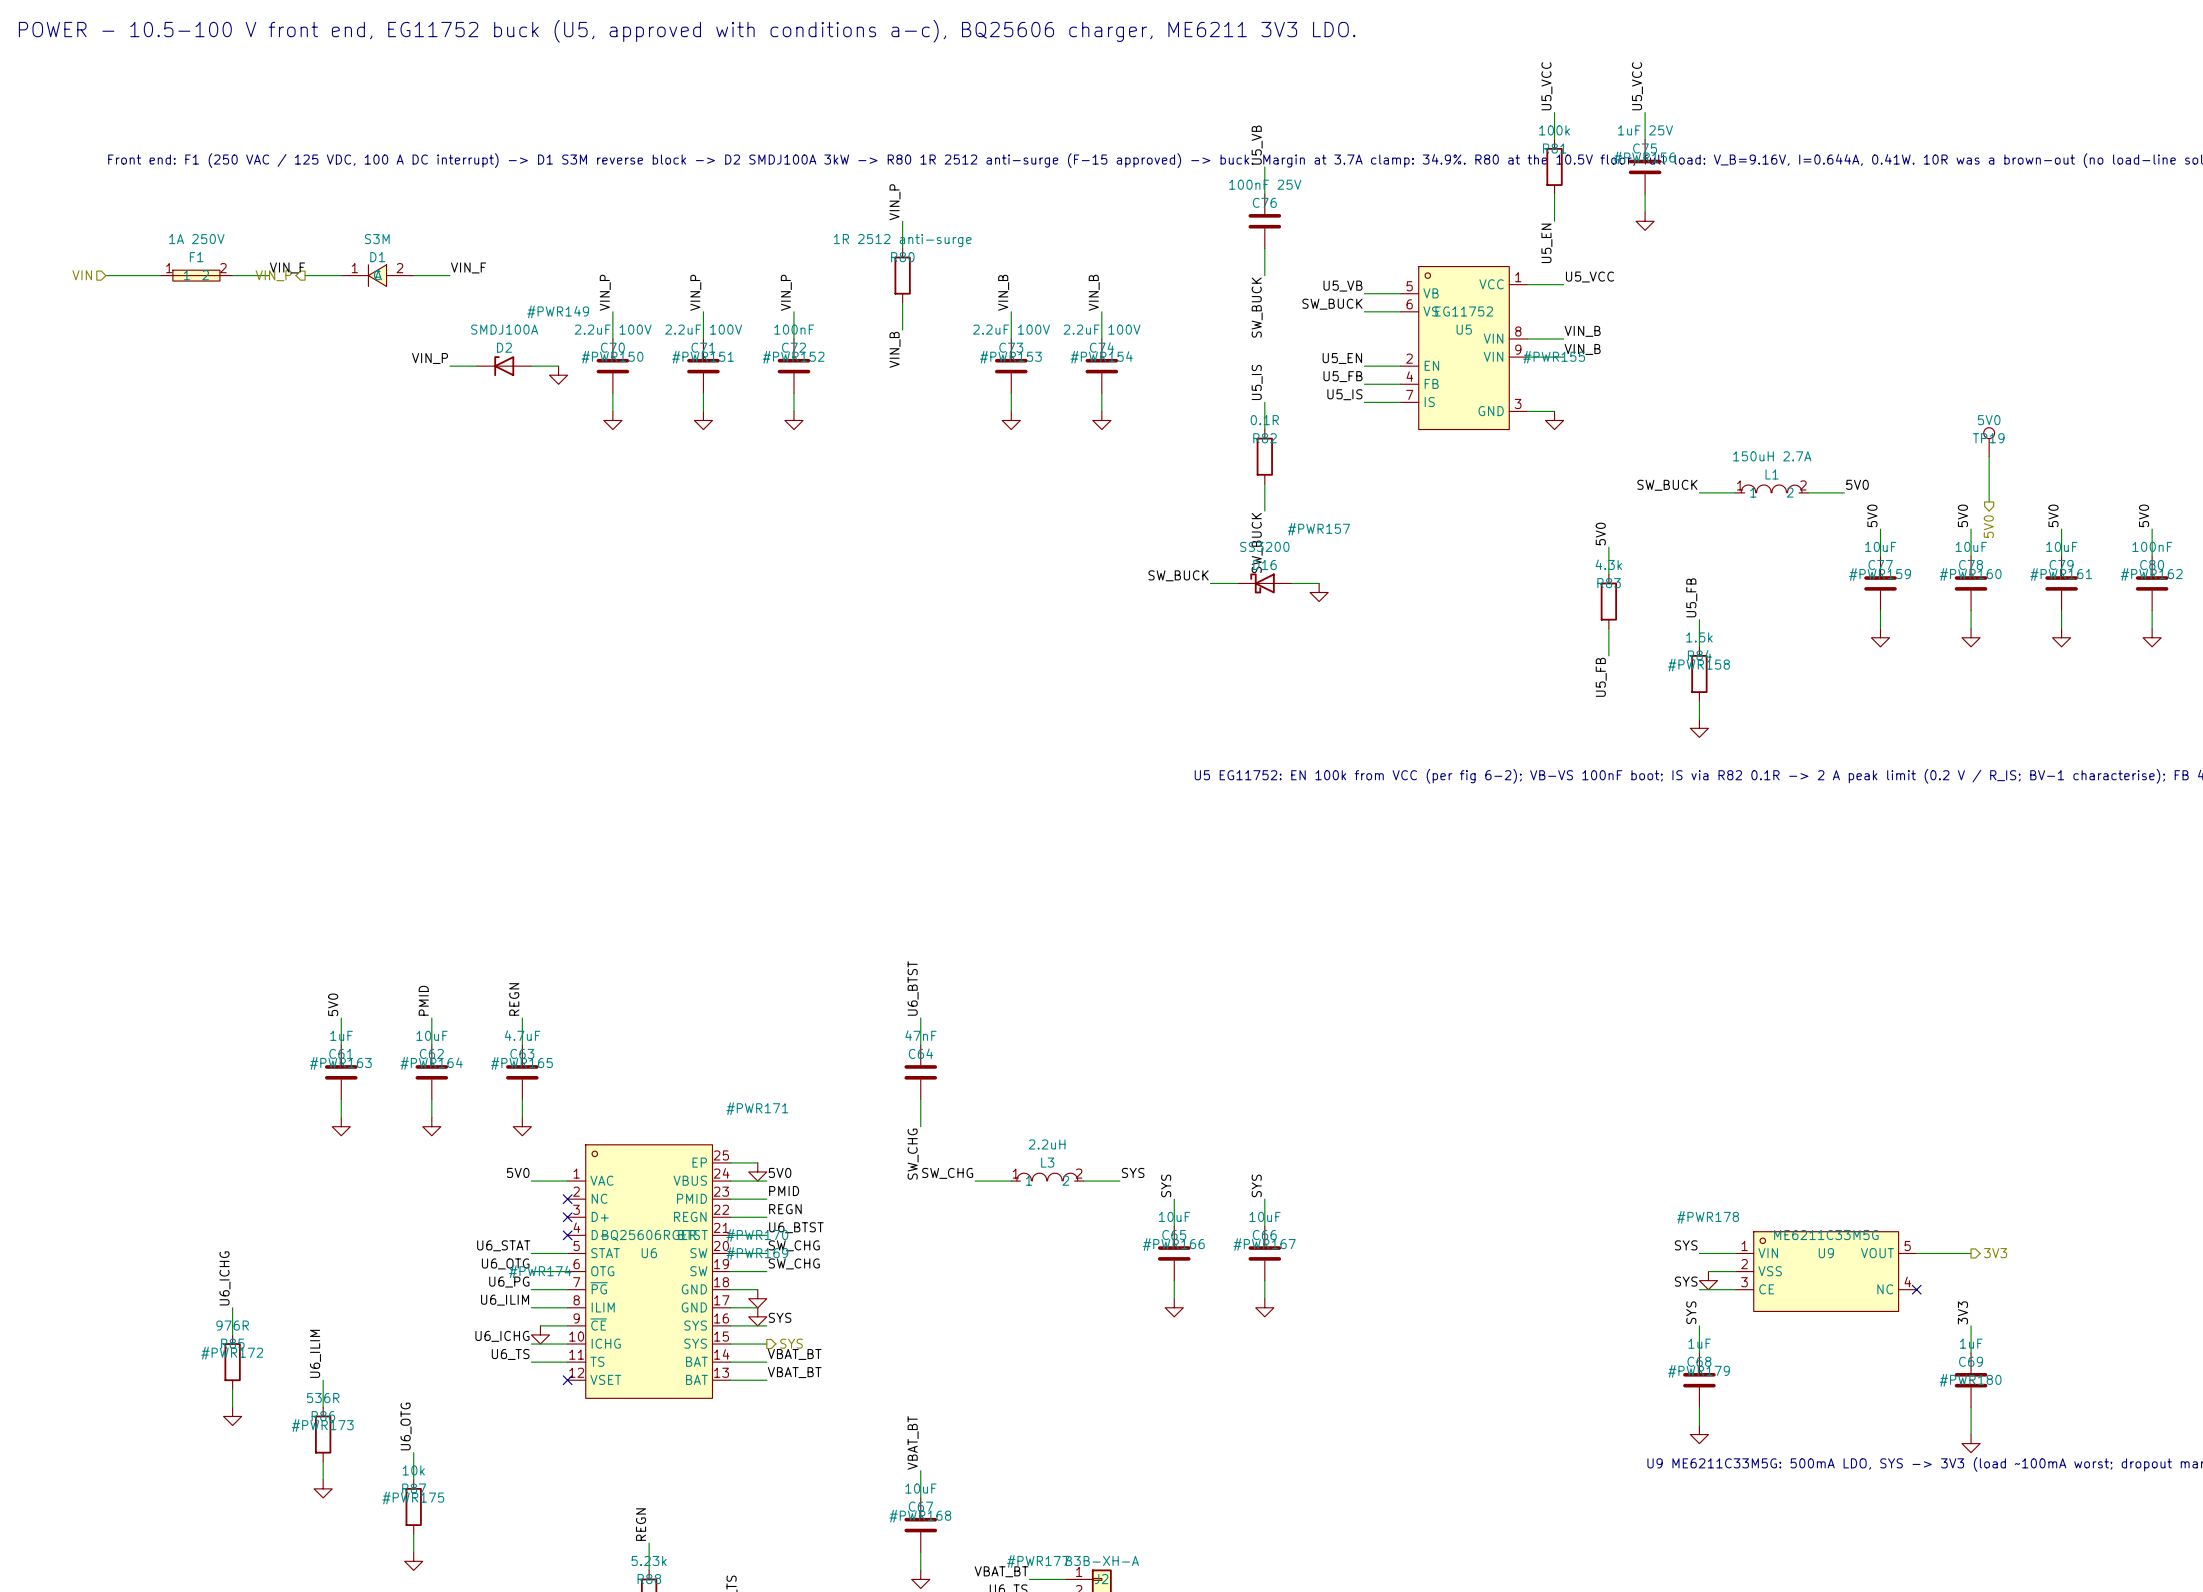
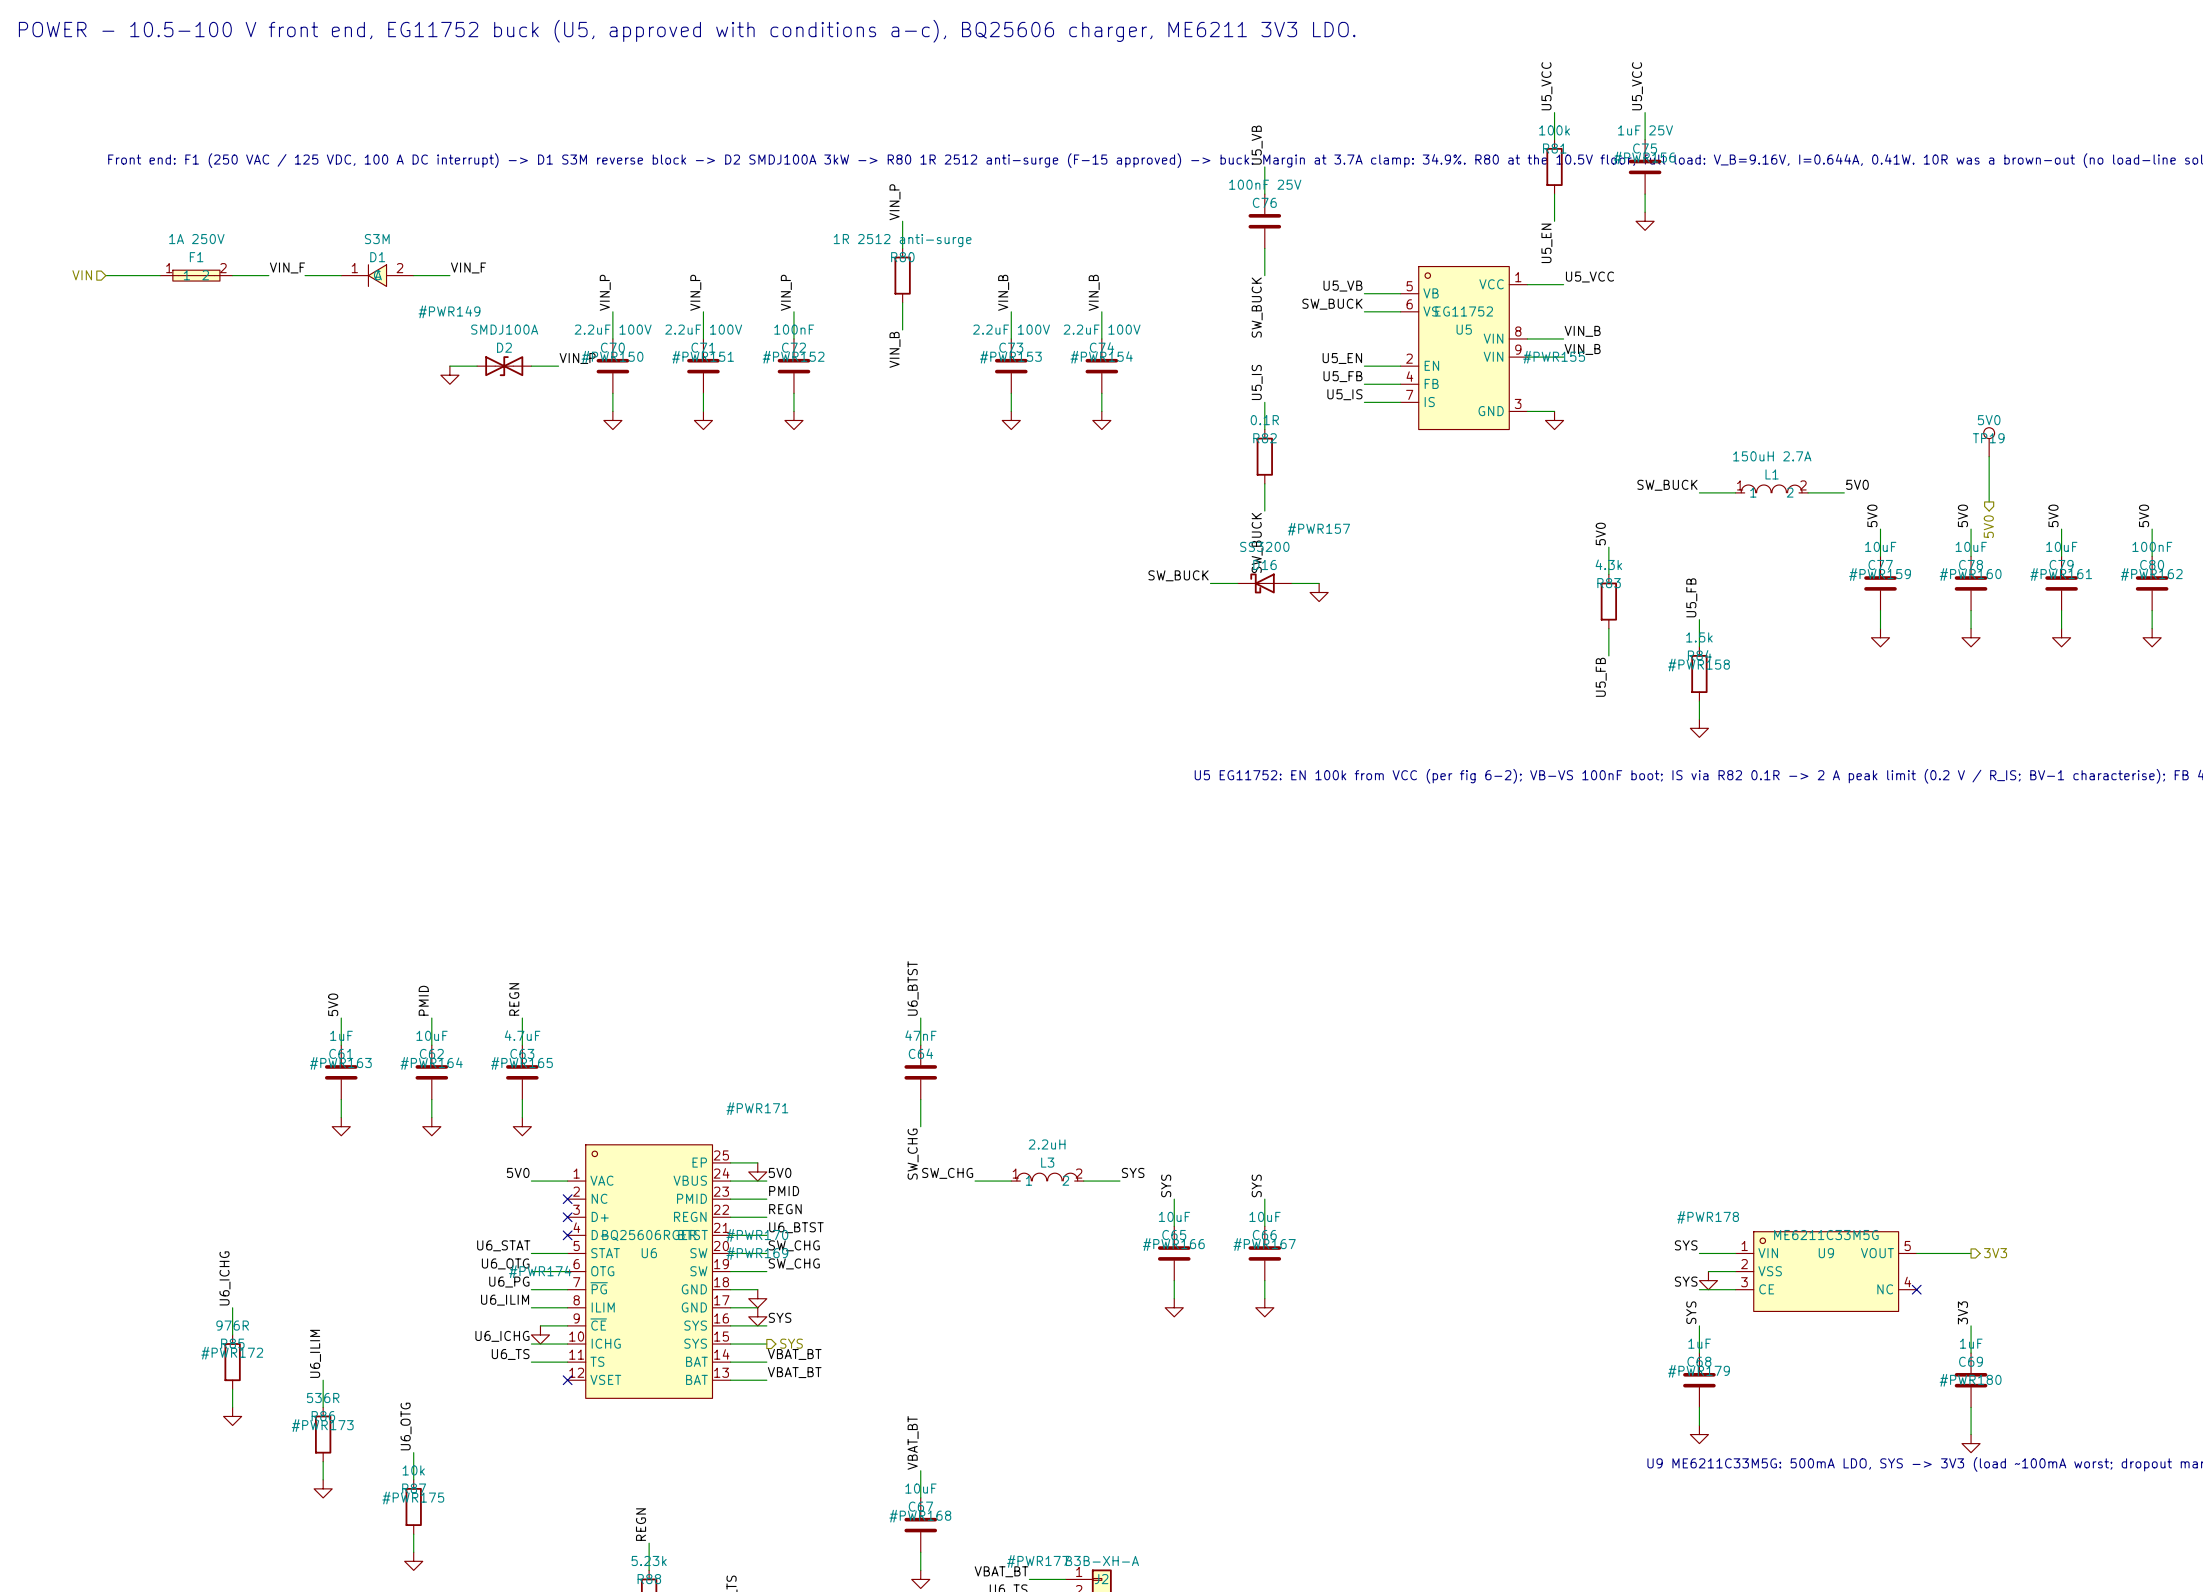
hierarchical label: VIN_P (273, 275) -> none
D2 symbol: [477, 356, 532, 377] -> [477, 356, 532, 377]
label position: VIN_P (430, 358) -> VIN_P (577, 358)
#PWR149 position: (558, 375) -> (449, 375)

